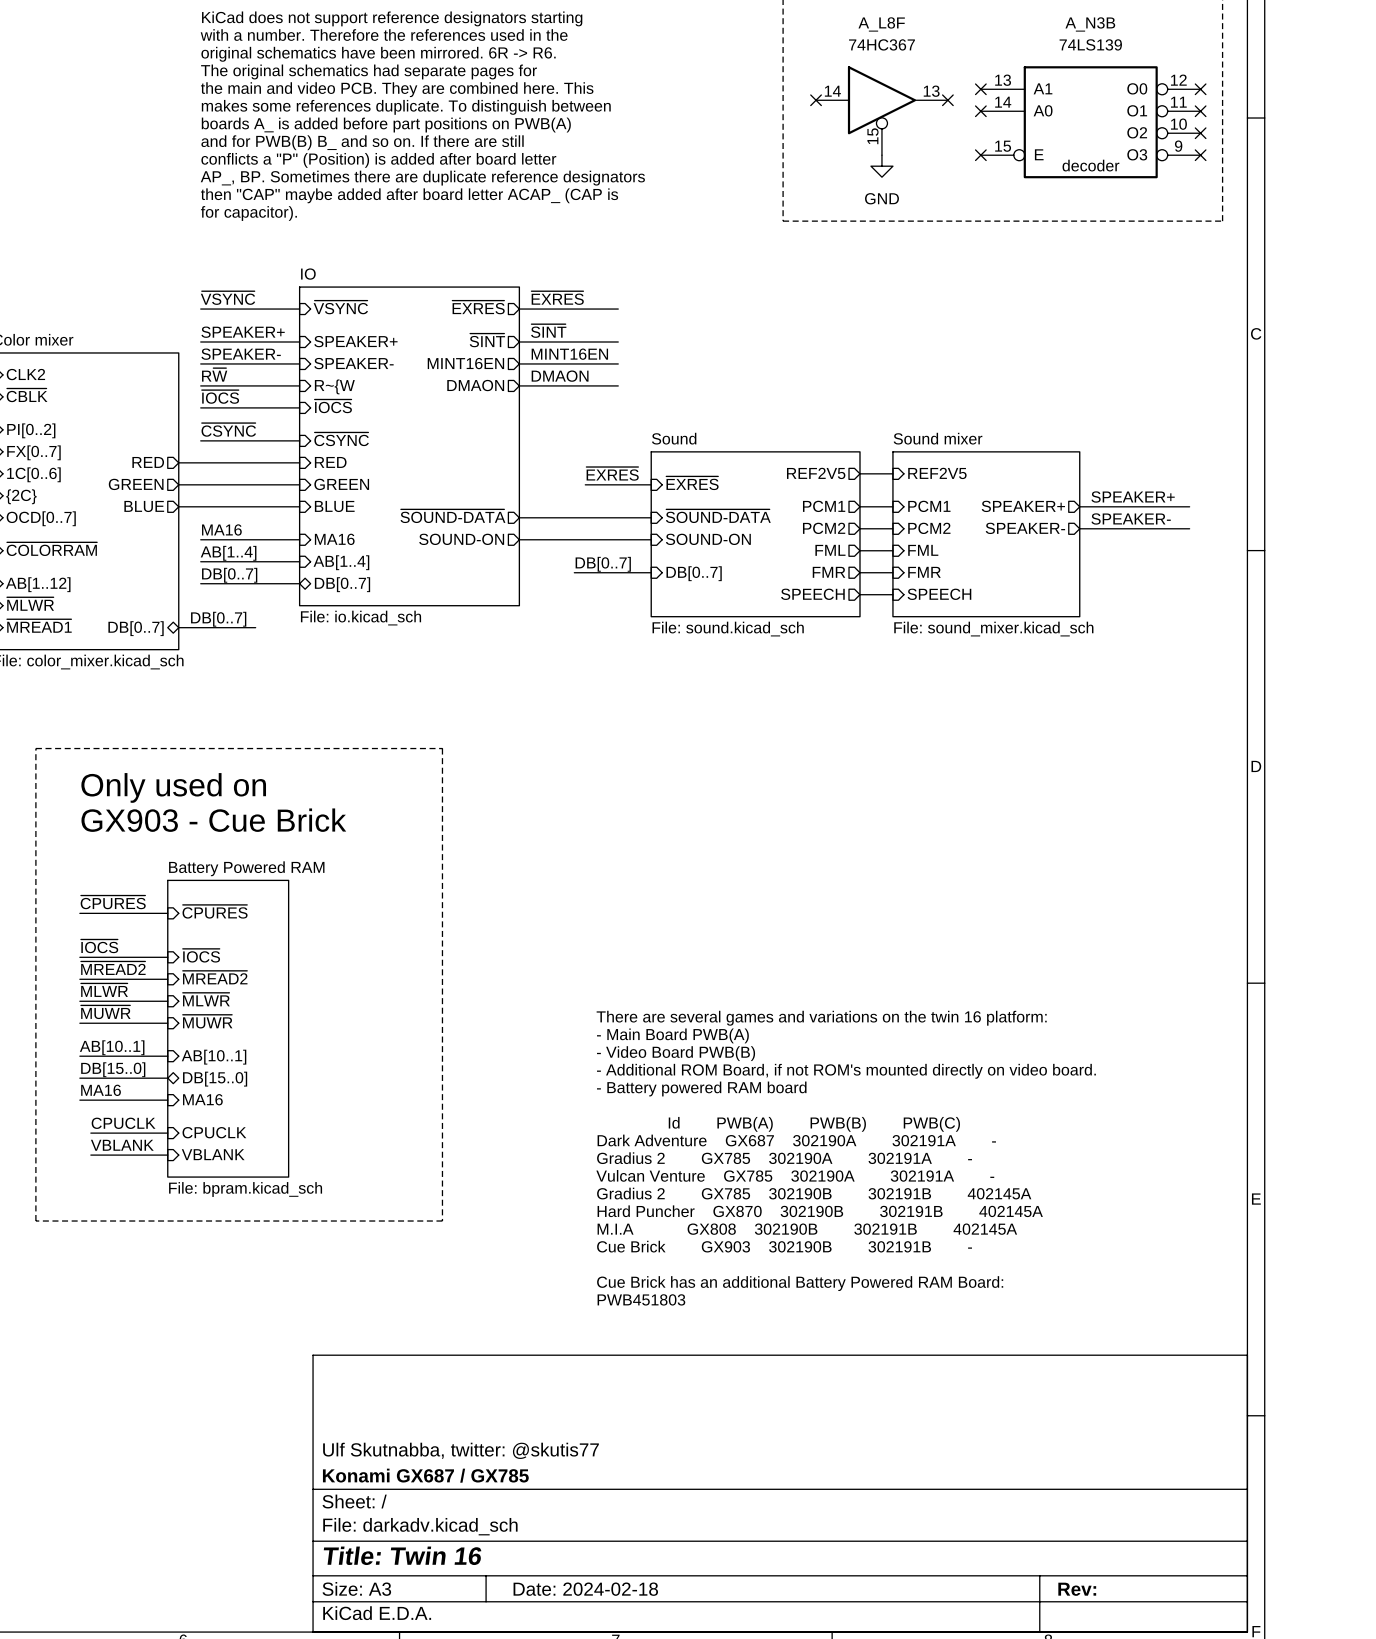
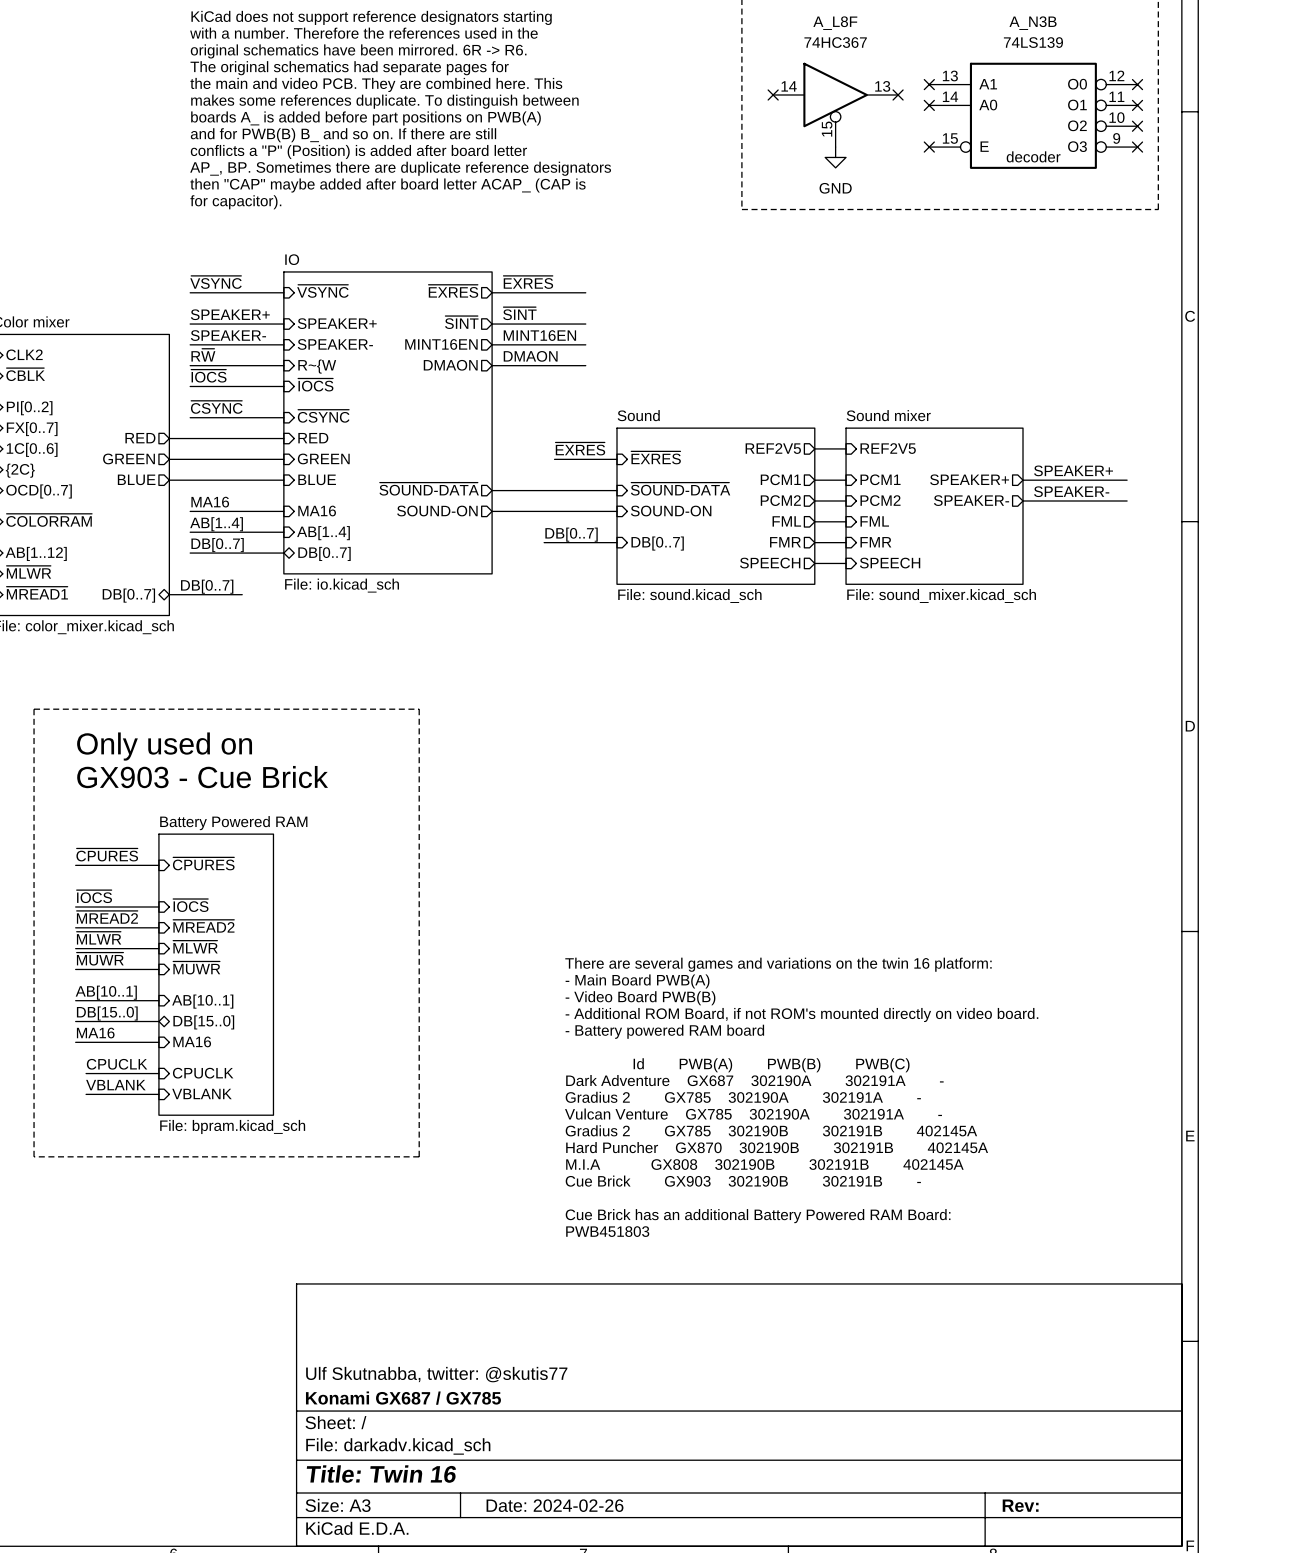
title block: Date: 2024-02-18 (585, 1589) -> Date: 2024-02-26 (555, 1505)

